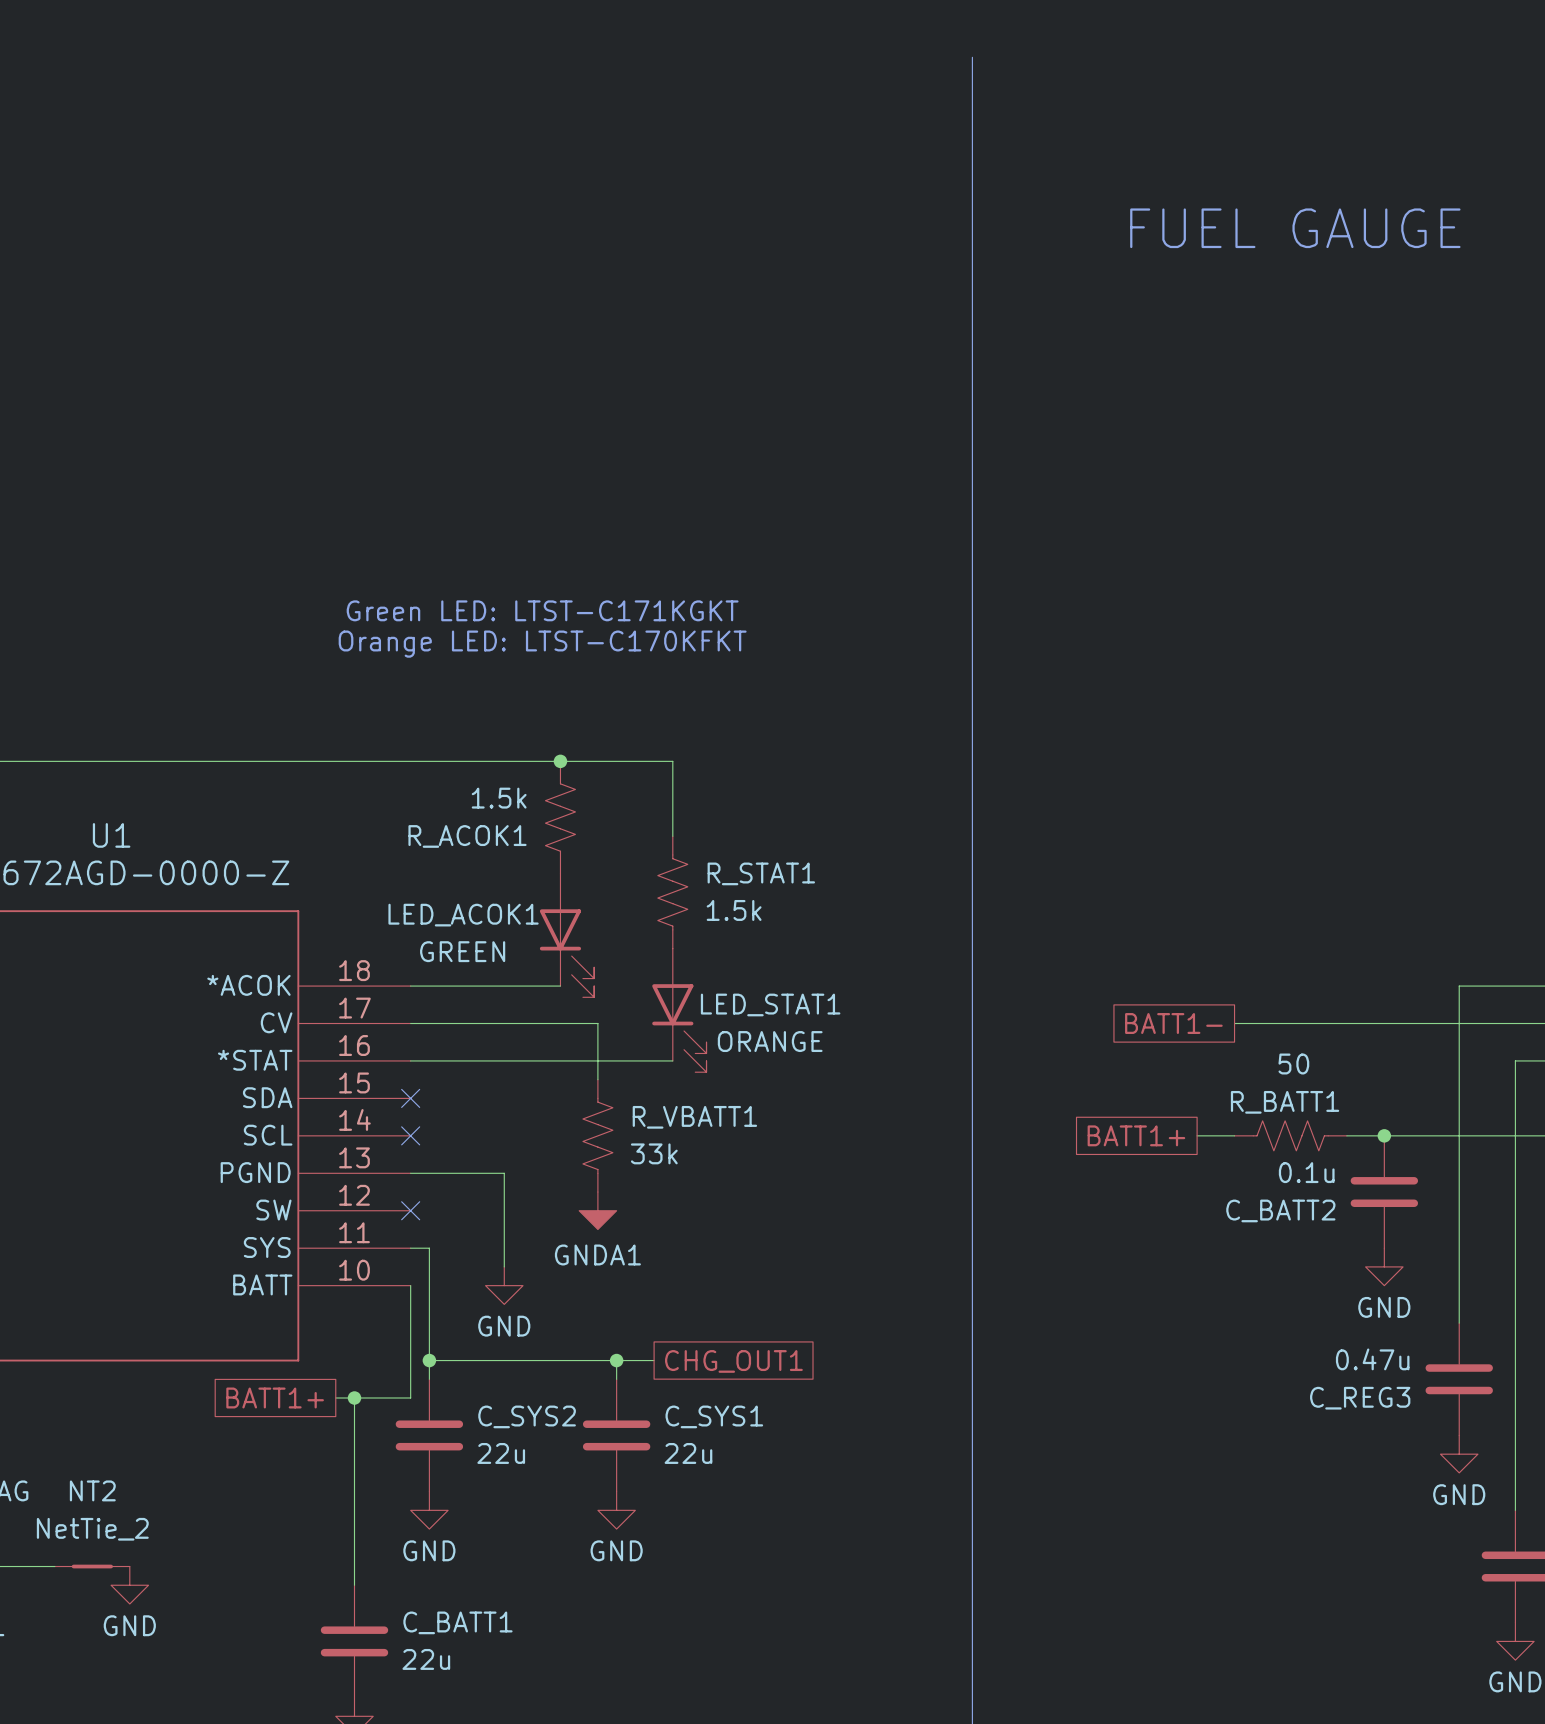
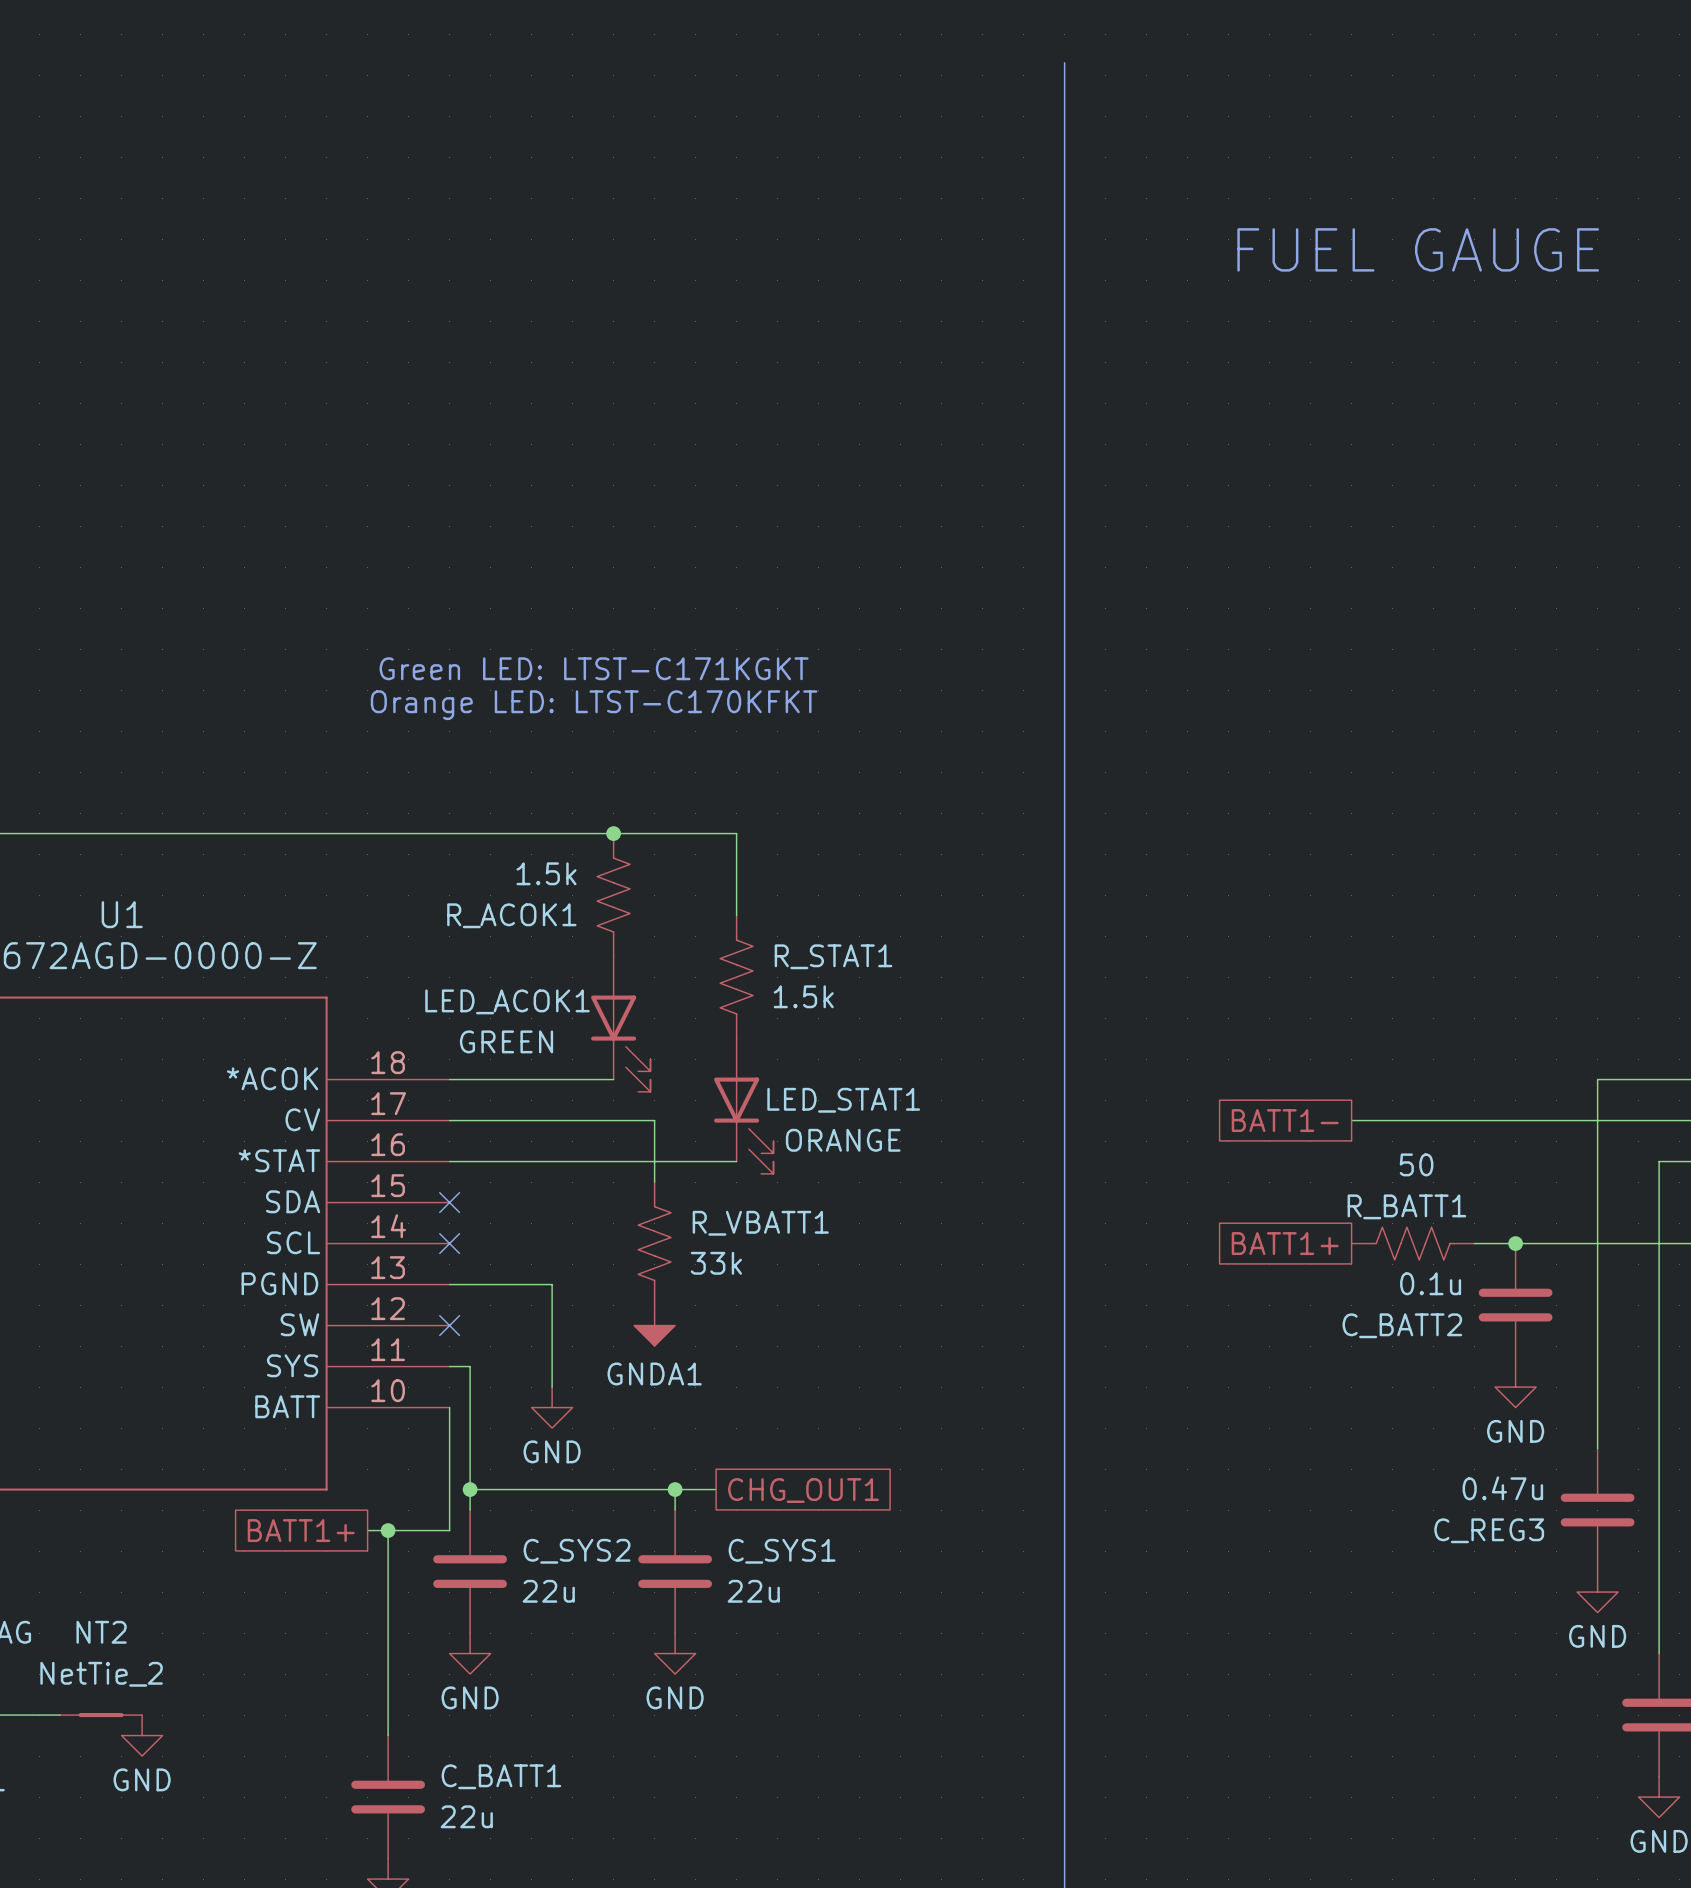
global label position: BATT1+ (1136, 1135) -> BATT1+ (1285, 1243)
wire: (1197, 1135) (1234, 1135) -> none

